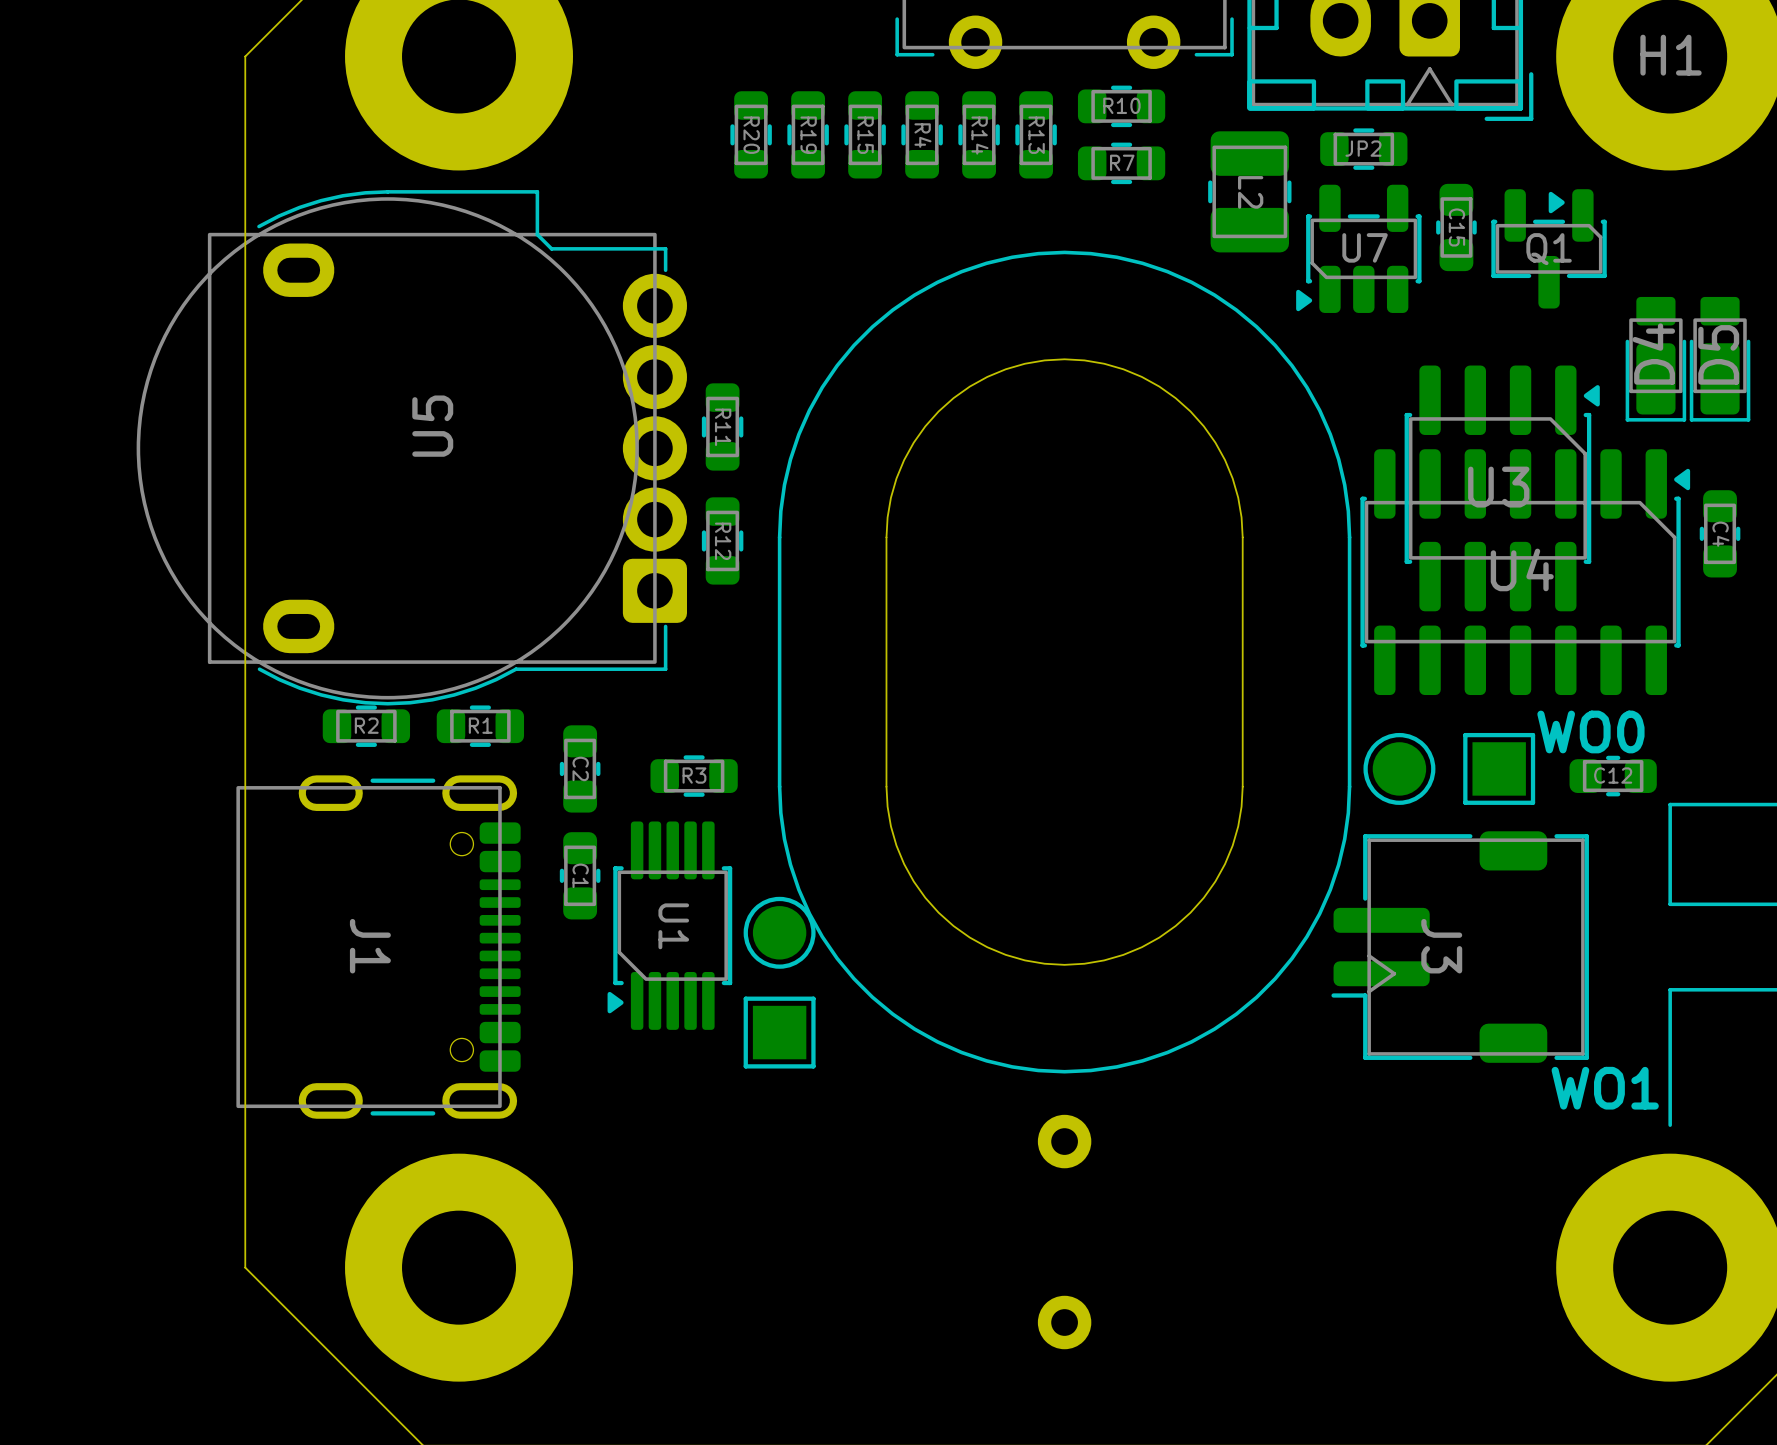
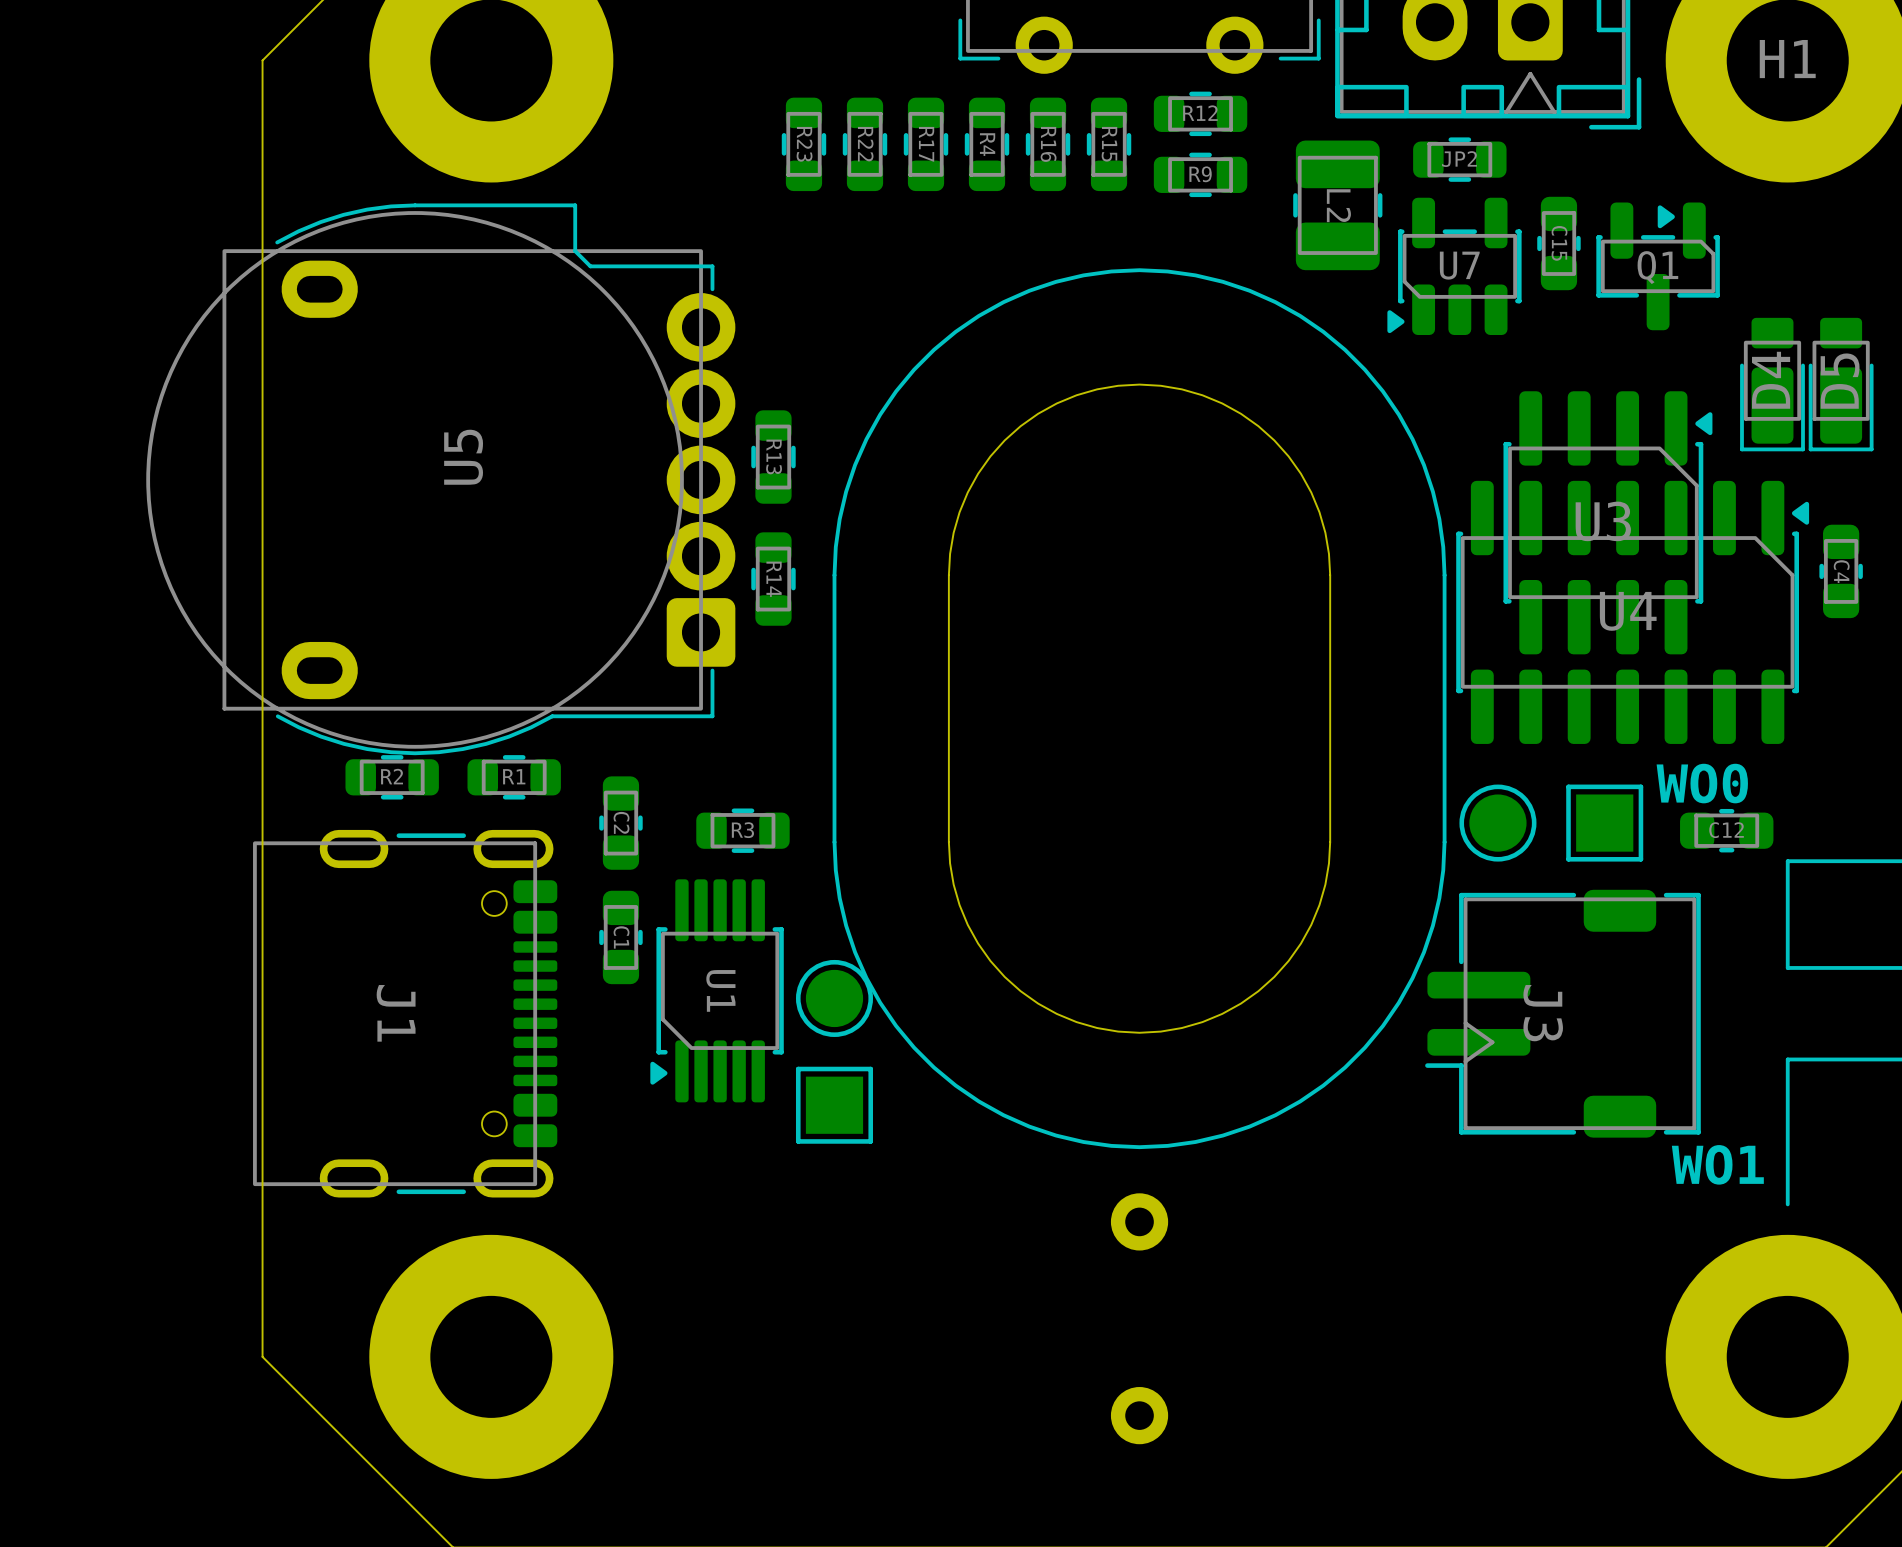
R10 name: R10 (1121, 105) -> R12 (1200, 113)
R20 name: R20 (751, 135) -> R23 (804, 144)
R19 name: R19 (808, 135) -> R22 (865, 144)
R15 name: R15 (865, 135) -> R17 (926, 144)
R14 name: R14 (979, 135) -> R16 (1048, 144)
R13 name: R13 (1036, 135) -> R15 (1109, 144)
R7 name: R7 (1122, 162) -> R9 (1200, 174)
R11 name: R11 (723, 427) -> R13 (774, 456)
R12 name: R12 (723, 541) -> R14 (774, 579)

